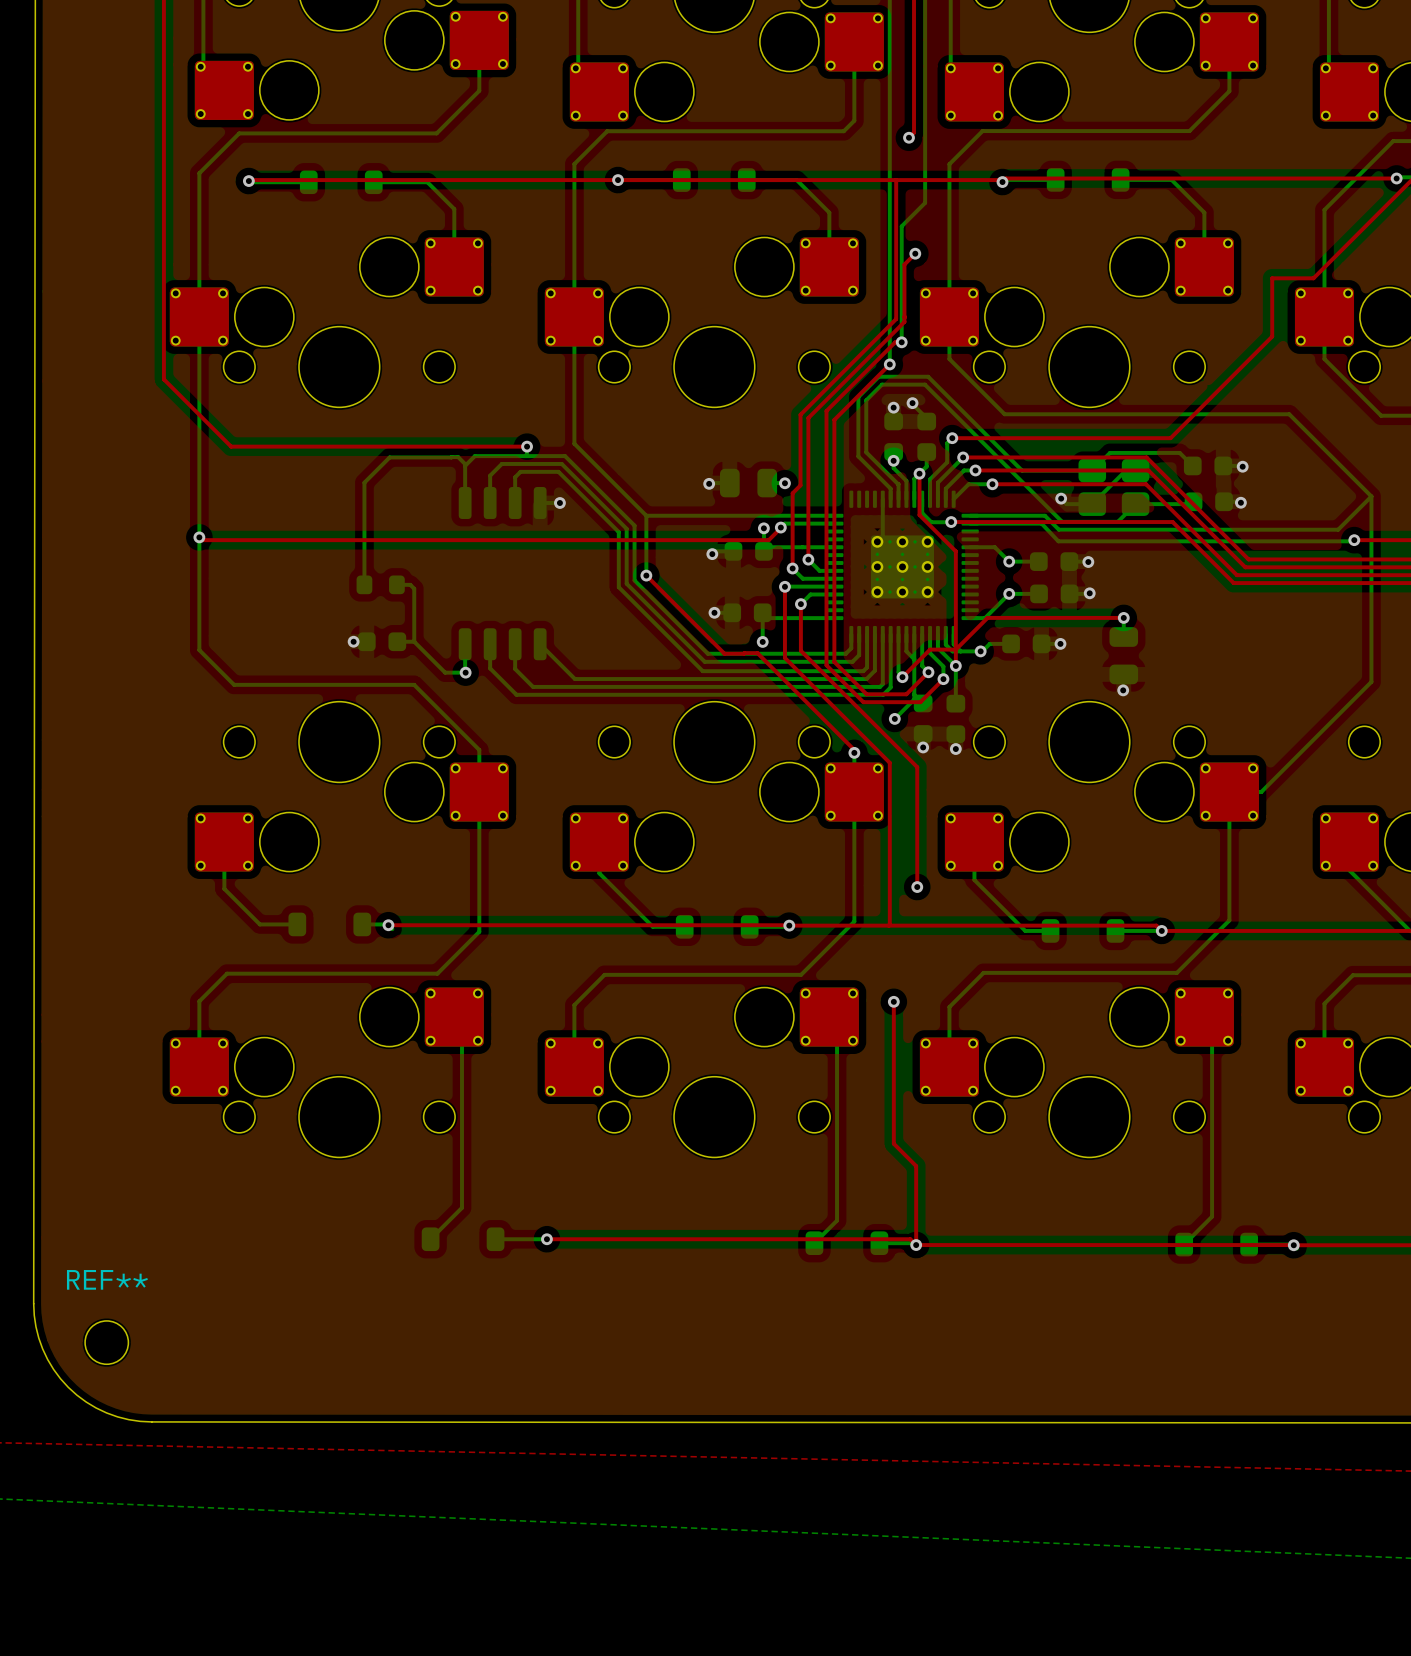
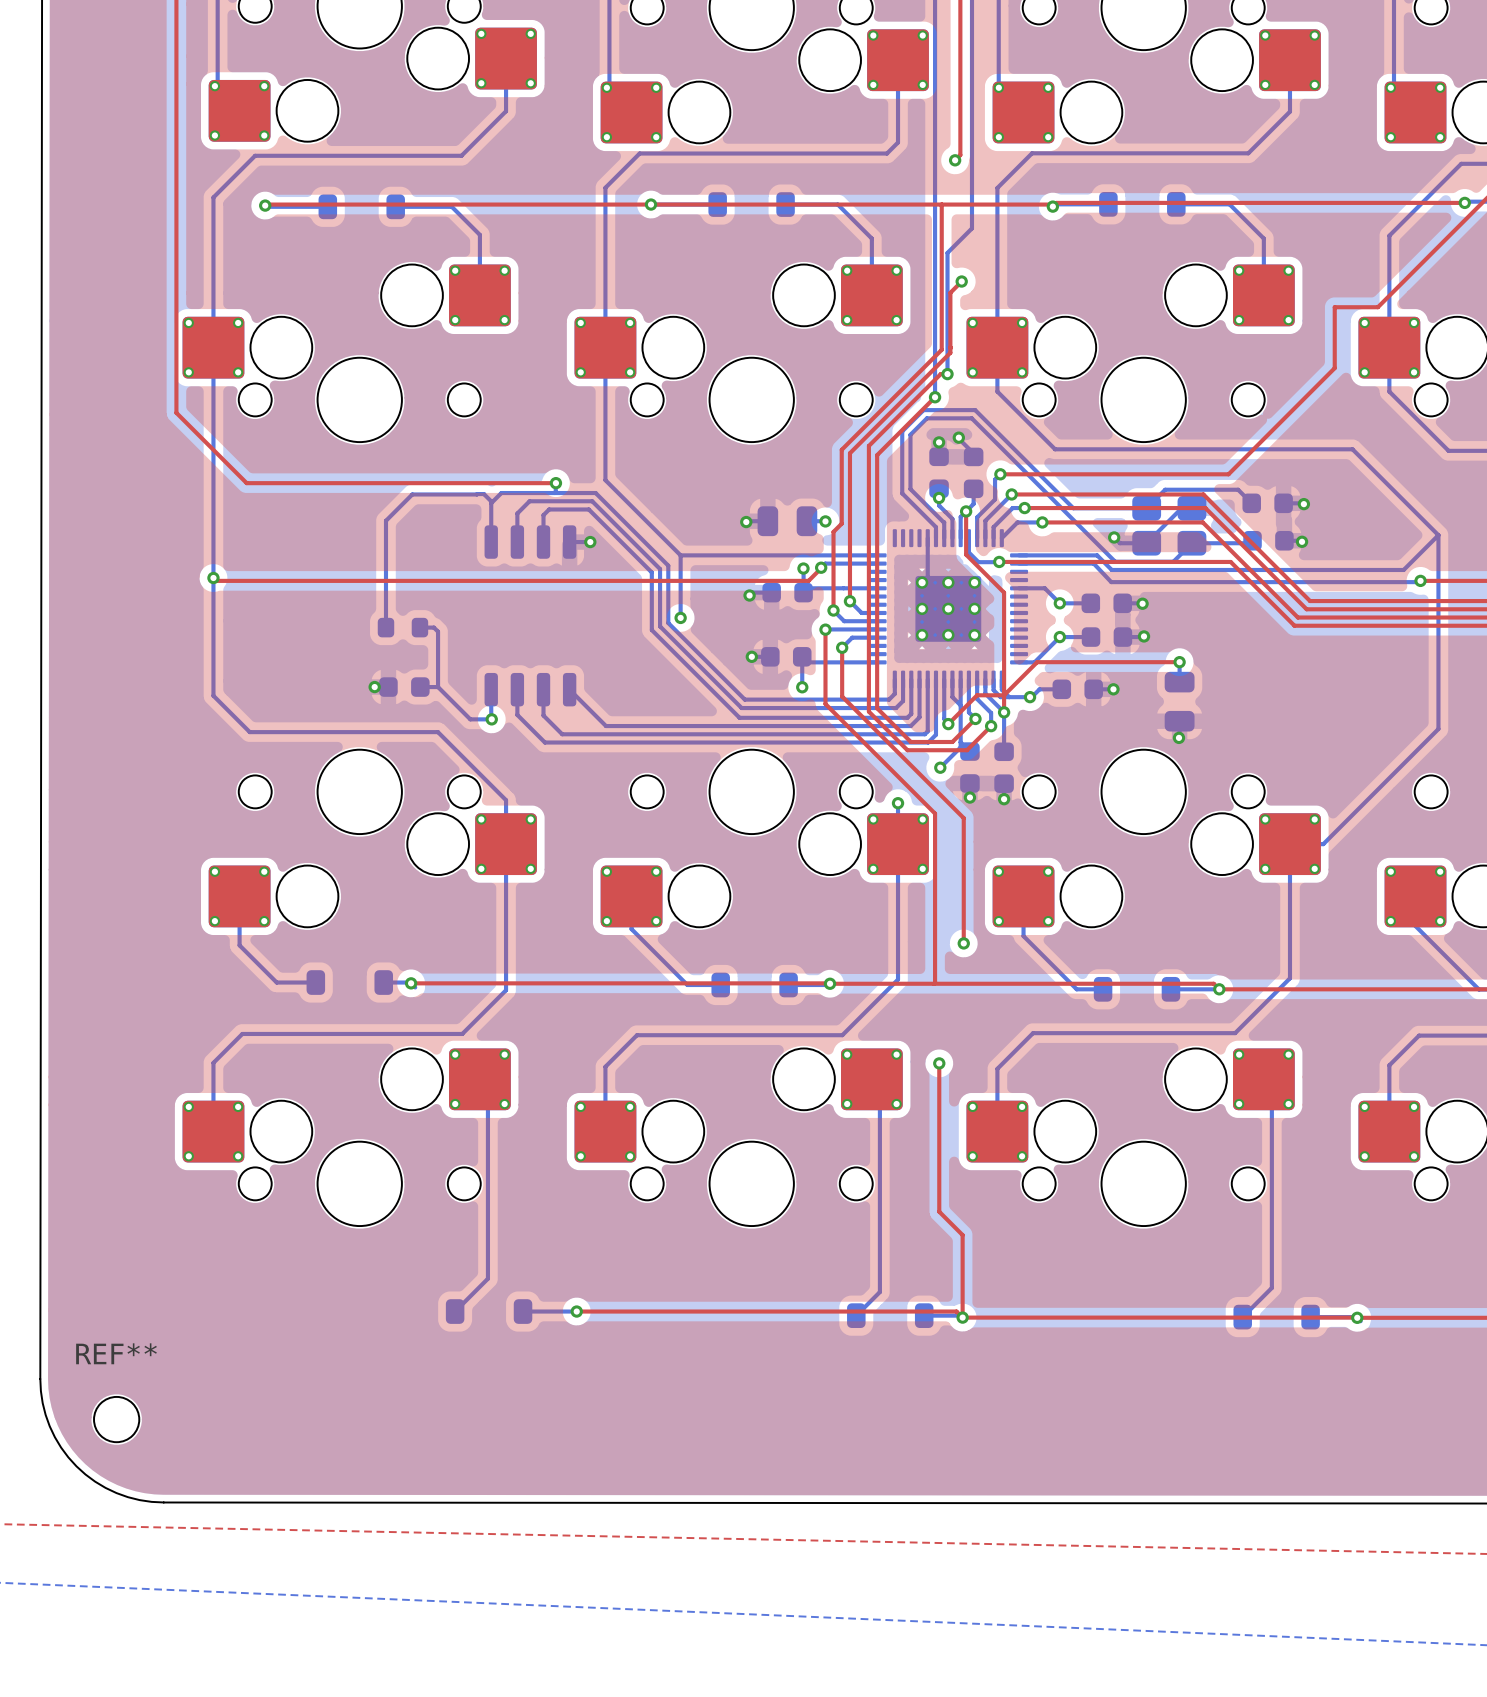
top track: (646, 575) (724, 653) (757, 653) (854, 749) (854, 752) -> none

